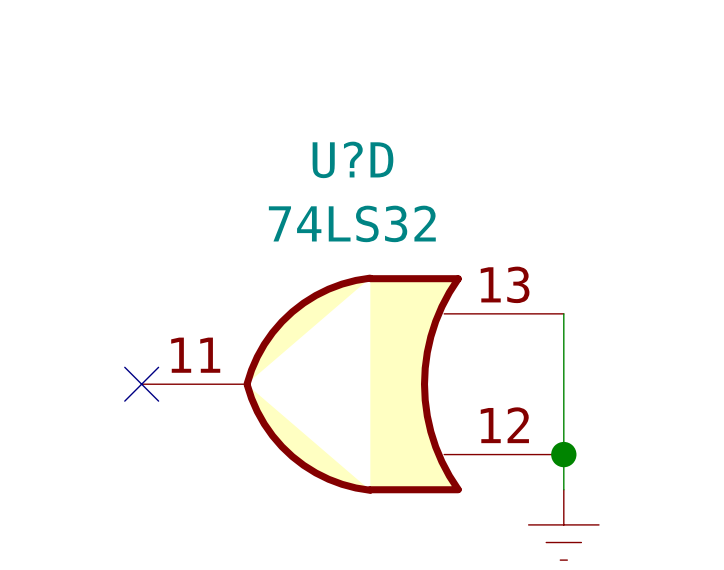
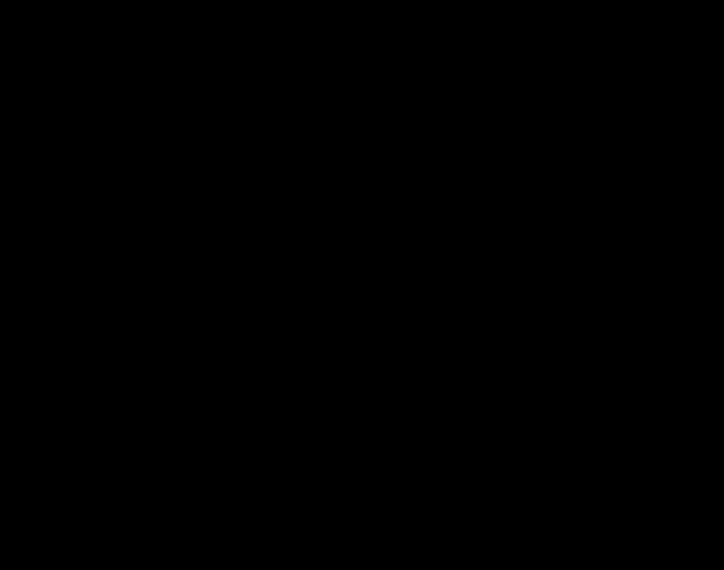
wire: (563, 313) (563, 489) -> none
no-connect mark: (141, 384) -> none
U?D: 74LS32 (352, 384) -> none
junction: (563, 454) -> none
power symbol: (563, 524) -> none

